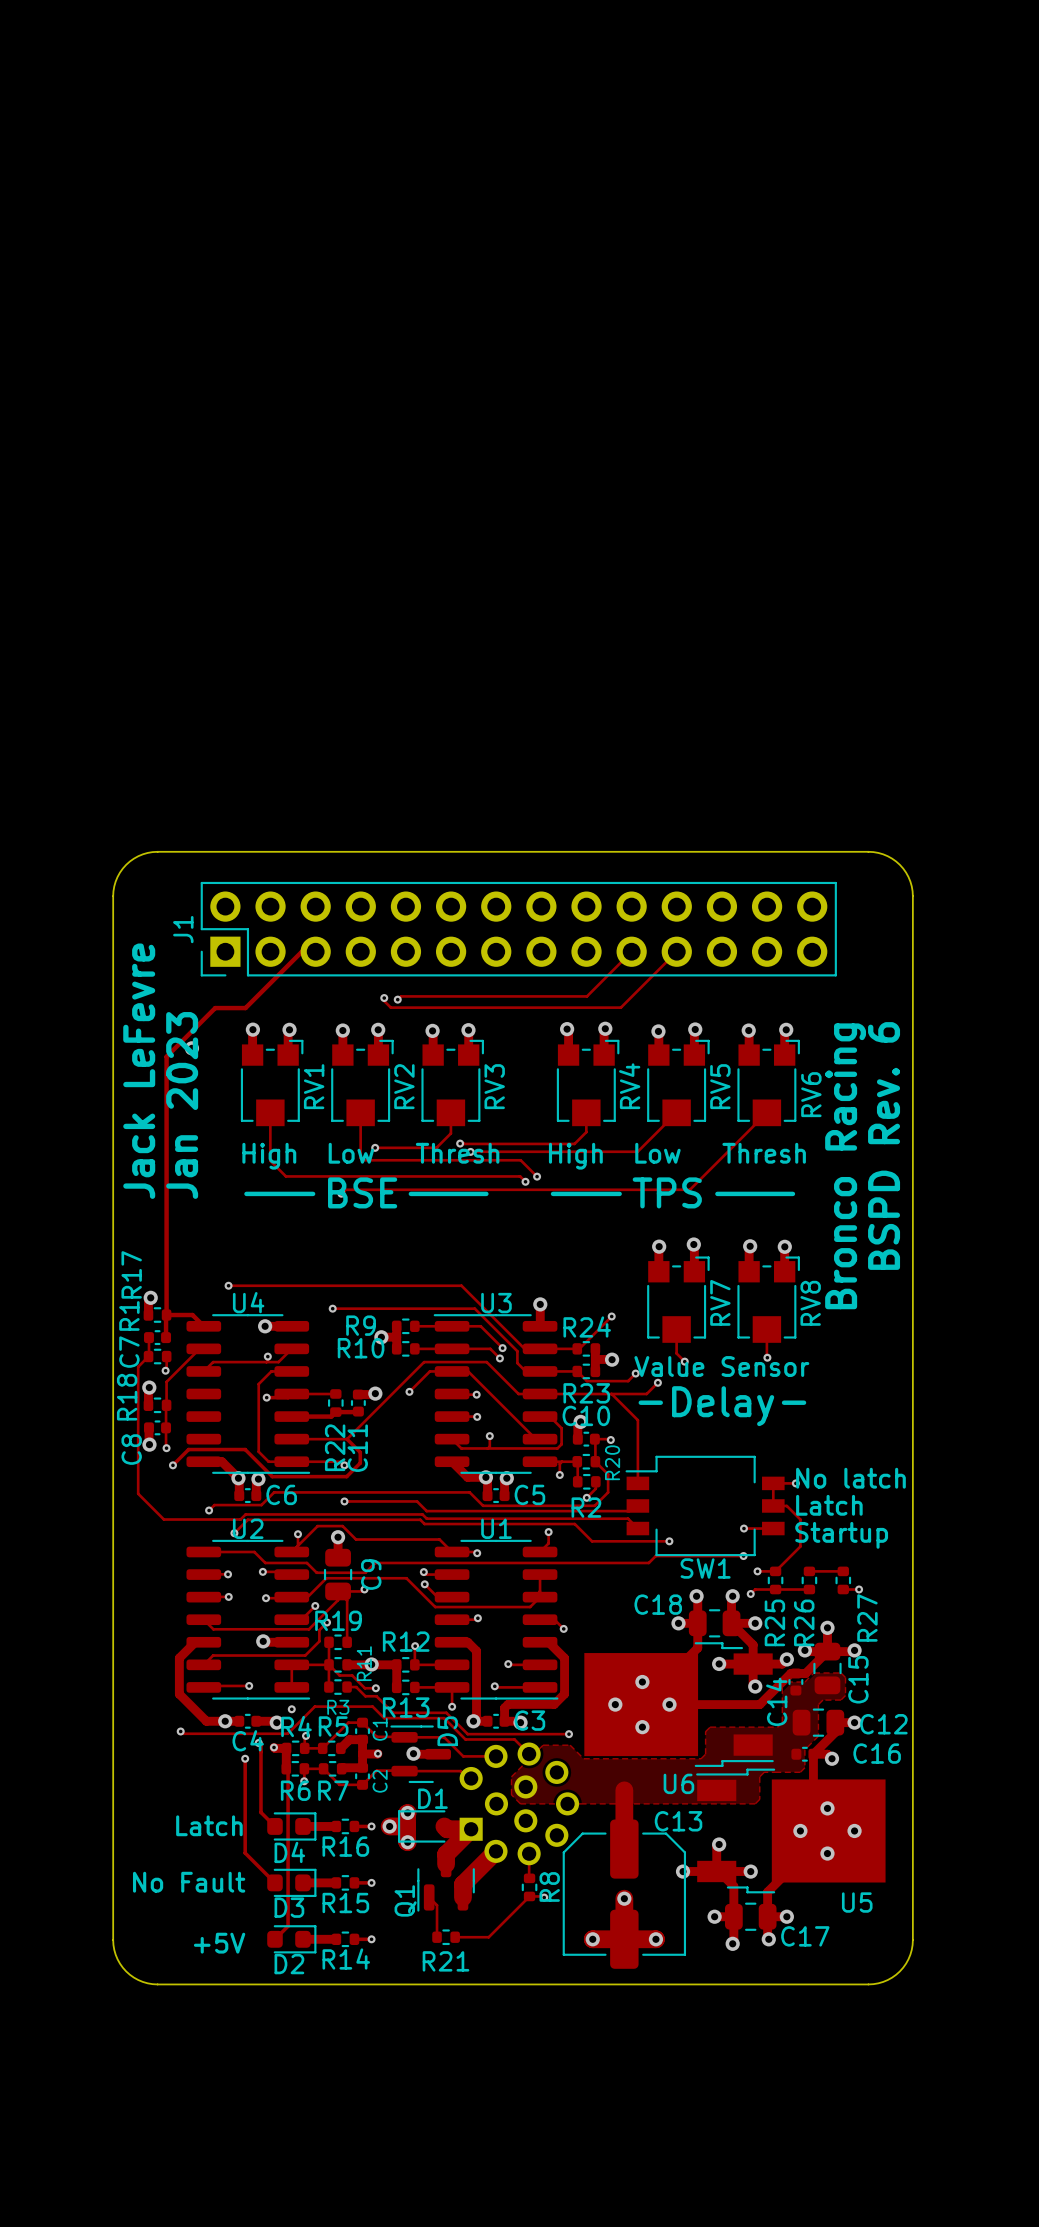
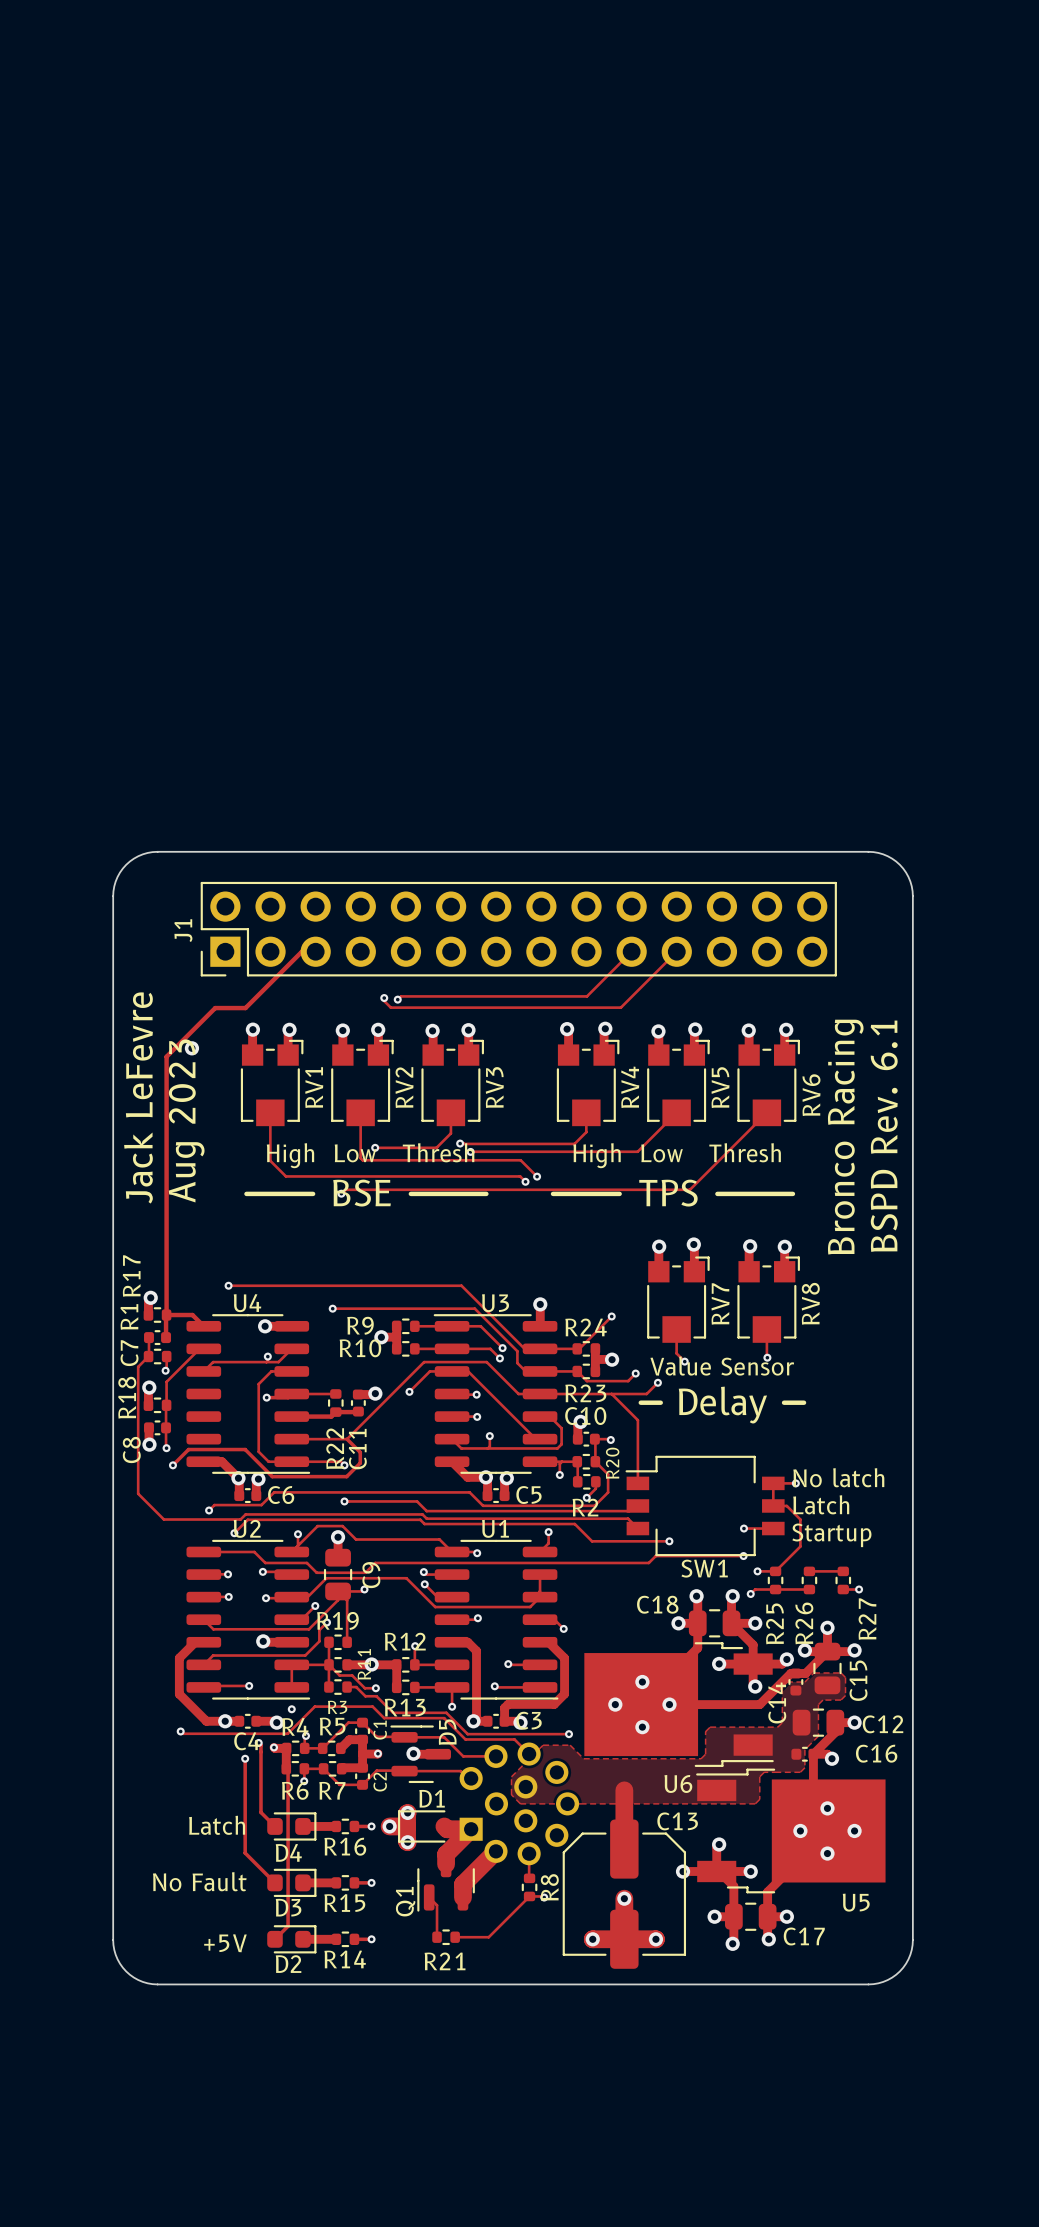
text: Jan 2023 (182, 1105) -> Aug 2023 (186, 1120)
text: BSPD Rev. 6 (884, 1146) -> BSPD Rev. 6.1 (884, 1136)

